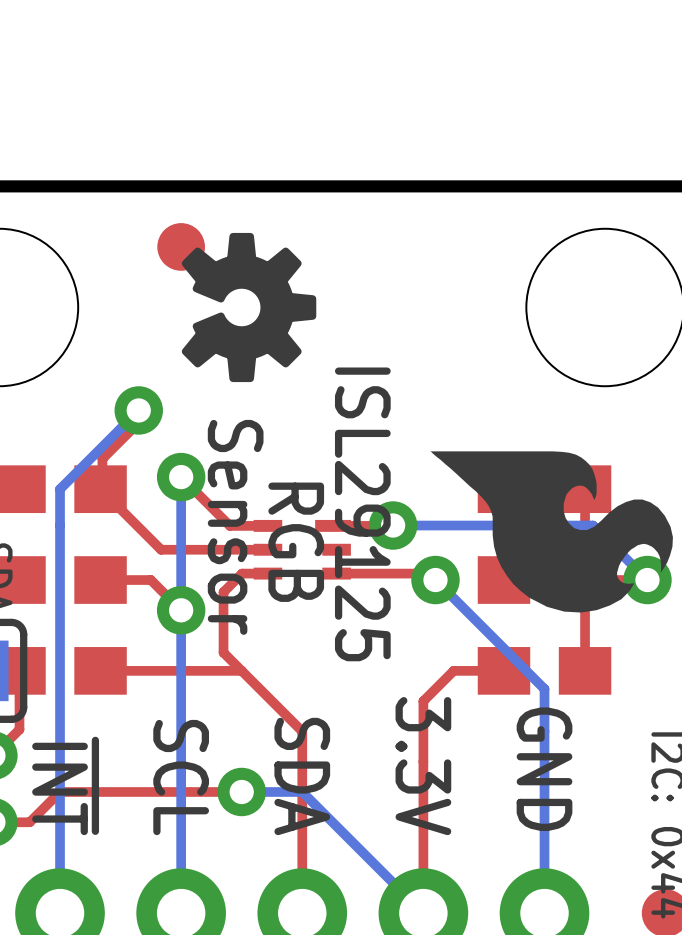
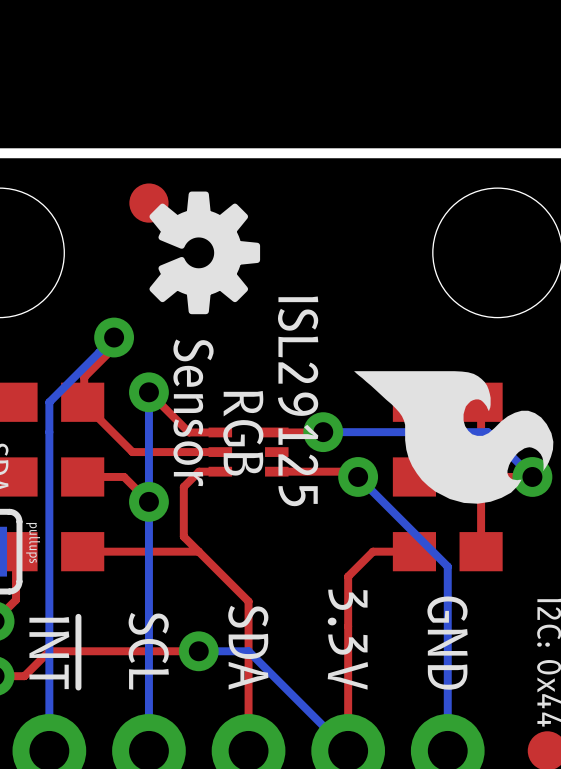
text: none -> pullups (33, 543)

